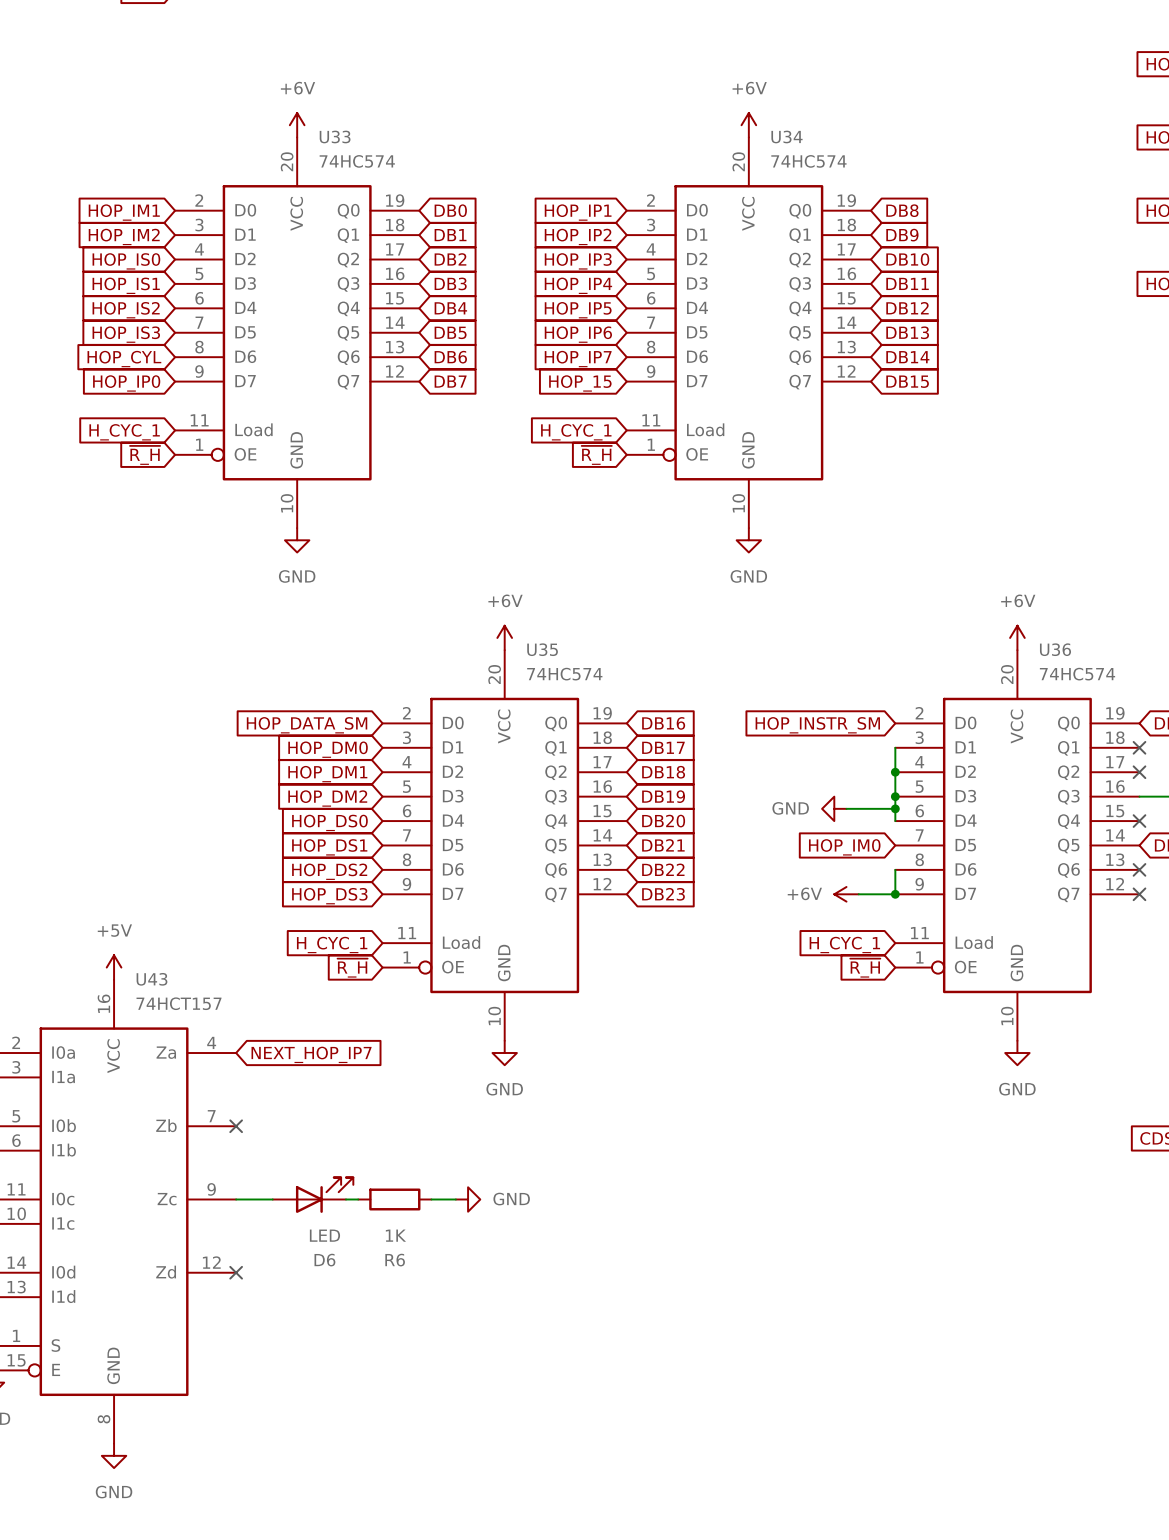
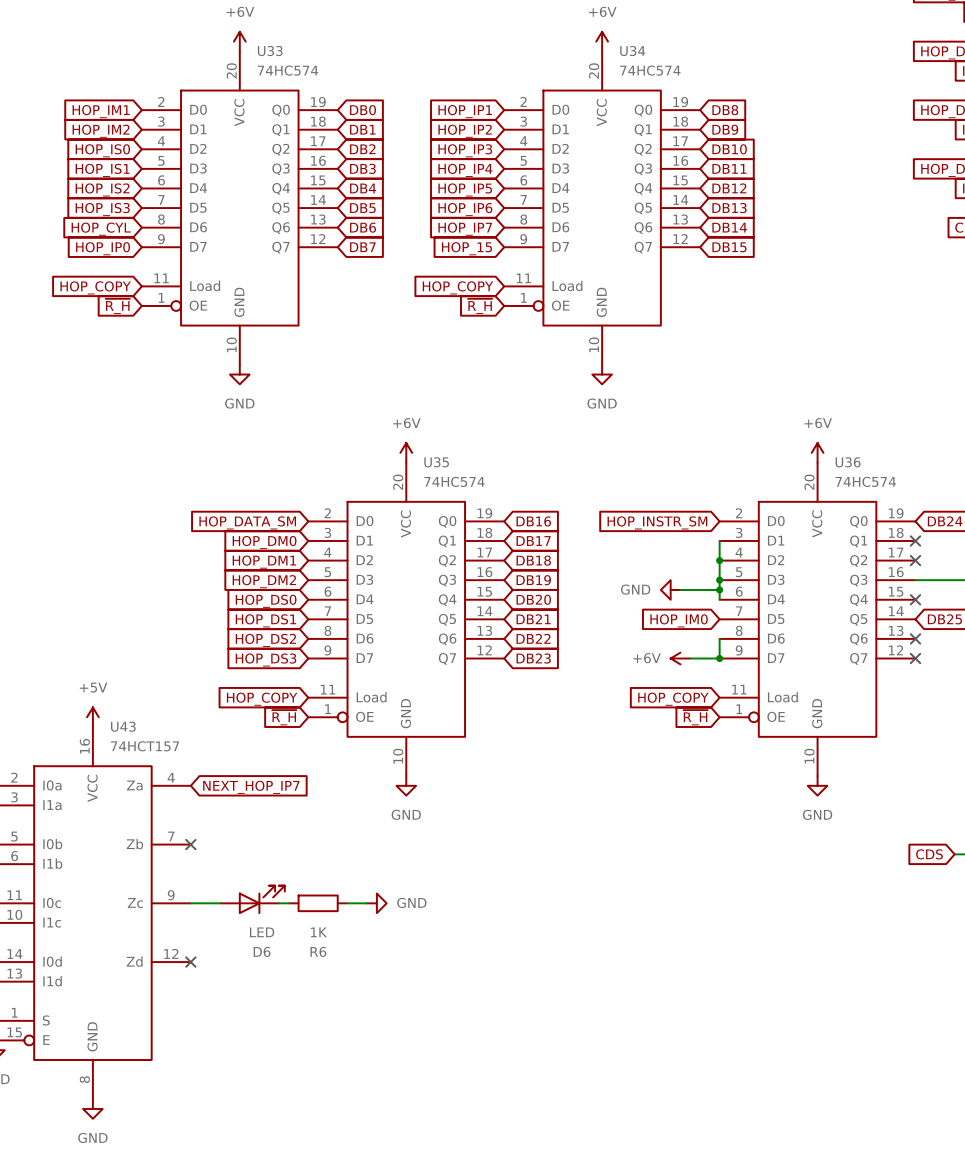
global label: H_CYC_1 (124, 432) -> HOP_COPY (95, 287)
global label: H_CYC_1 (576, 432) -> HOP_COPY (457, 287)
global label: H_CYC_1 (332, 945) -> HOP_COPY (262, 699)
global label: H_CYC_1 (844, 945) -> HOP_COPY (673, 699)

